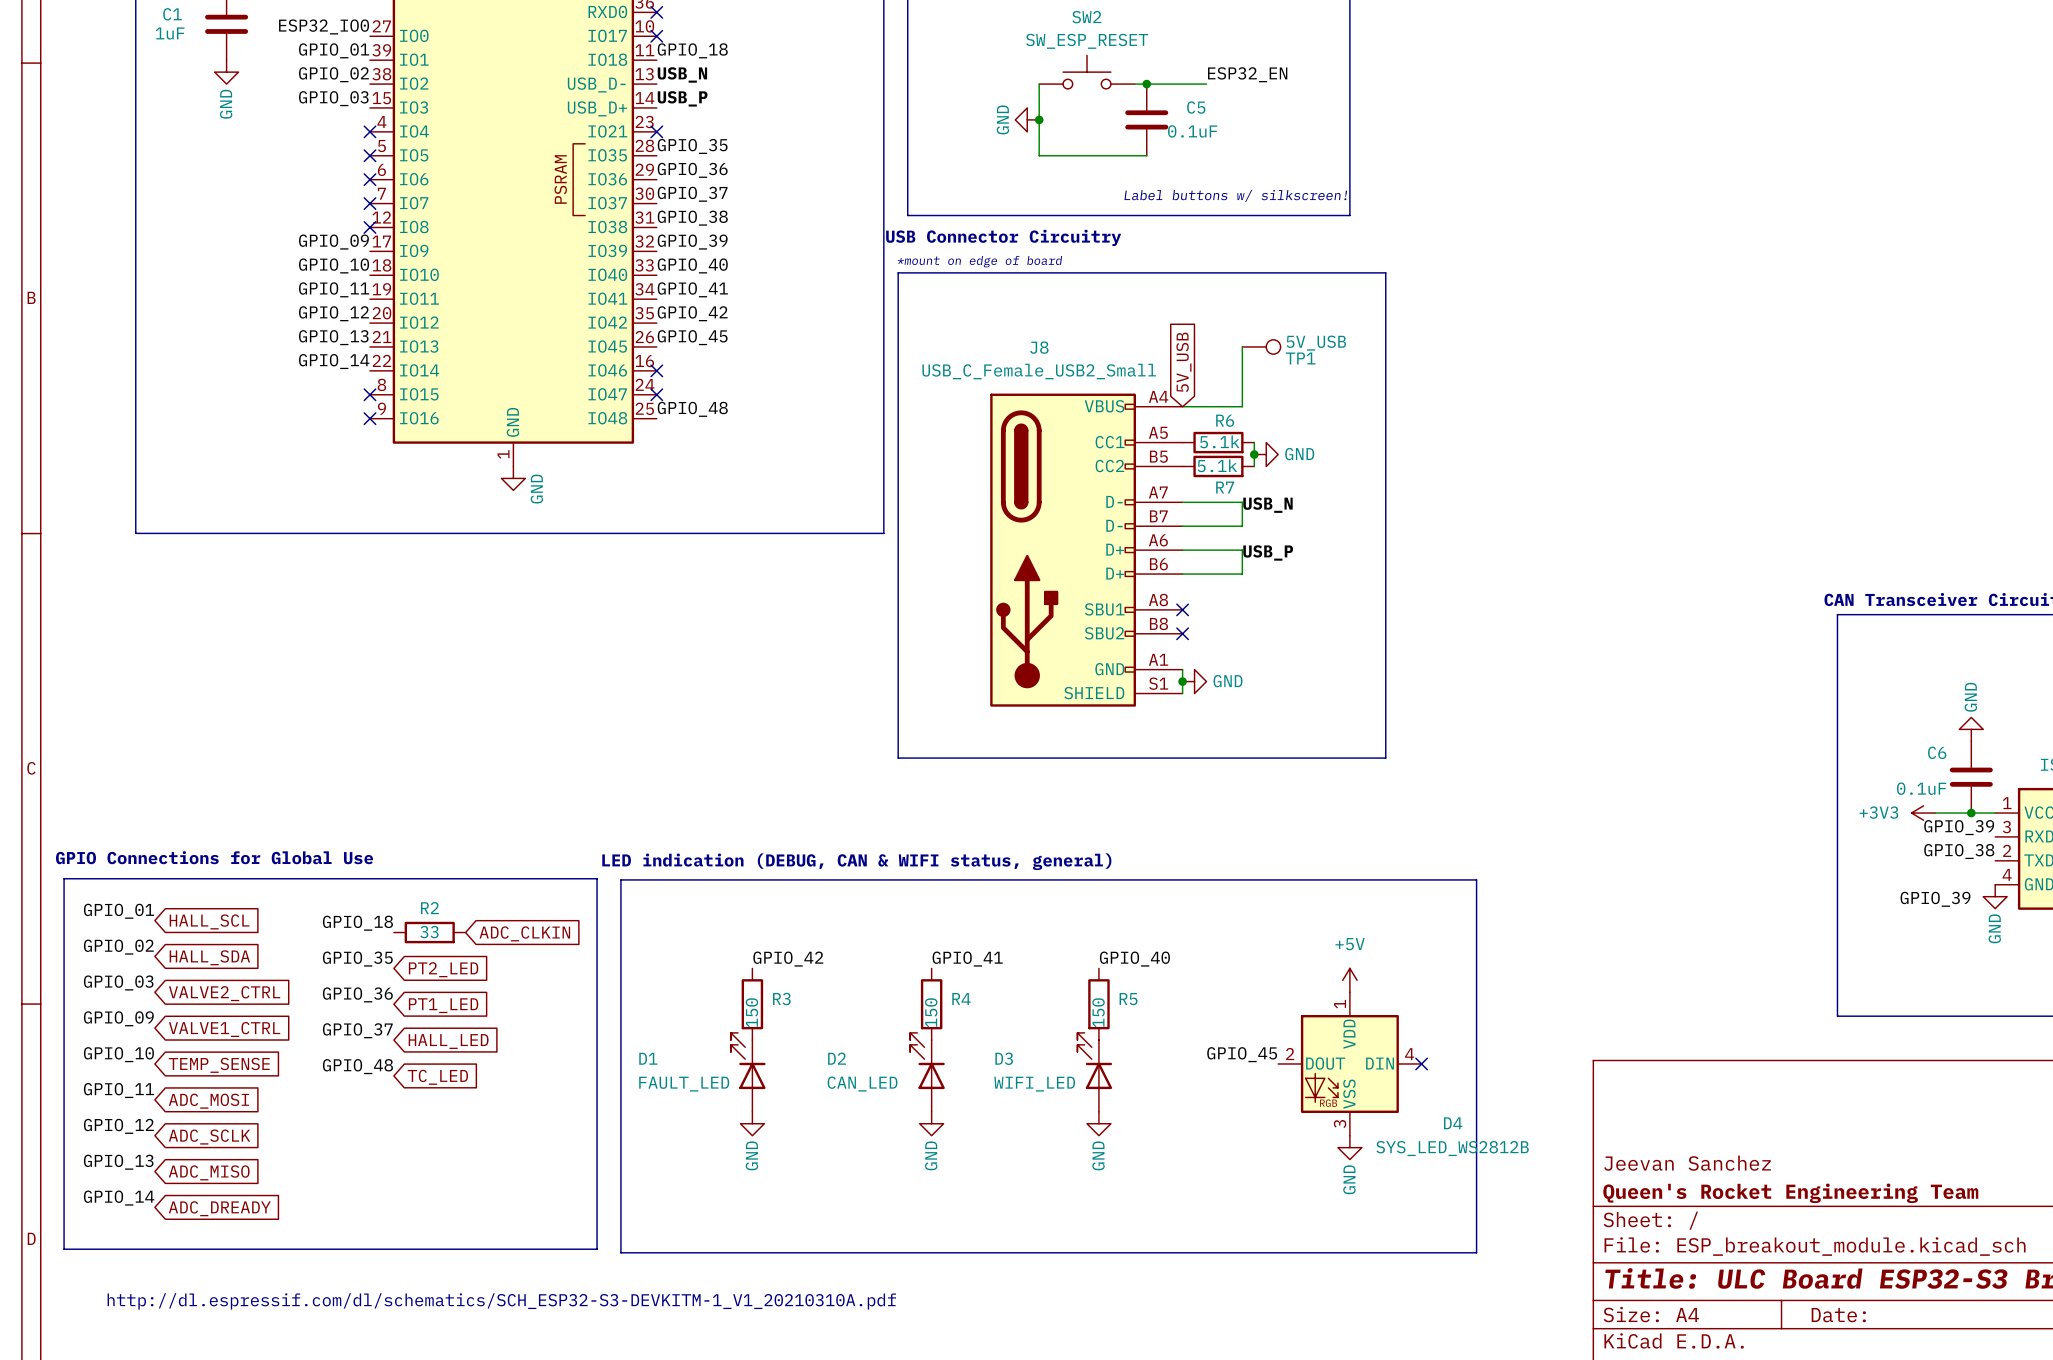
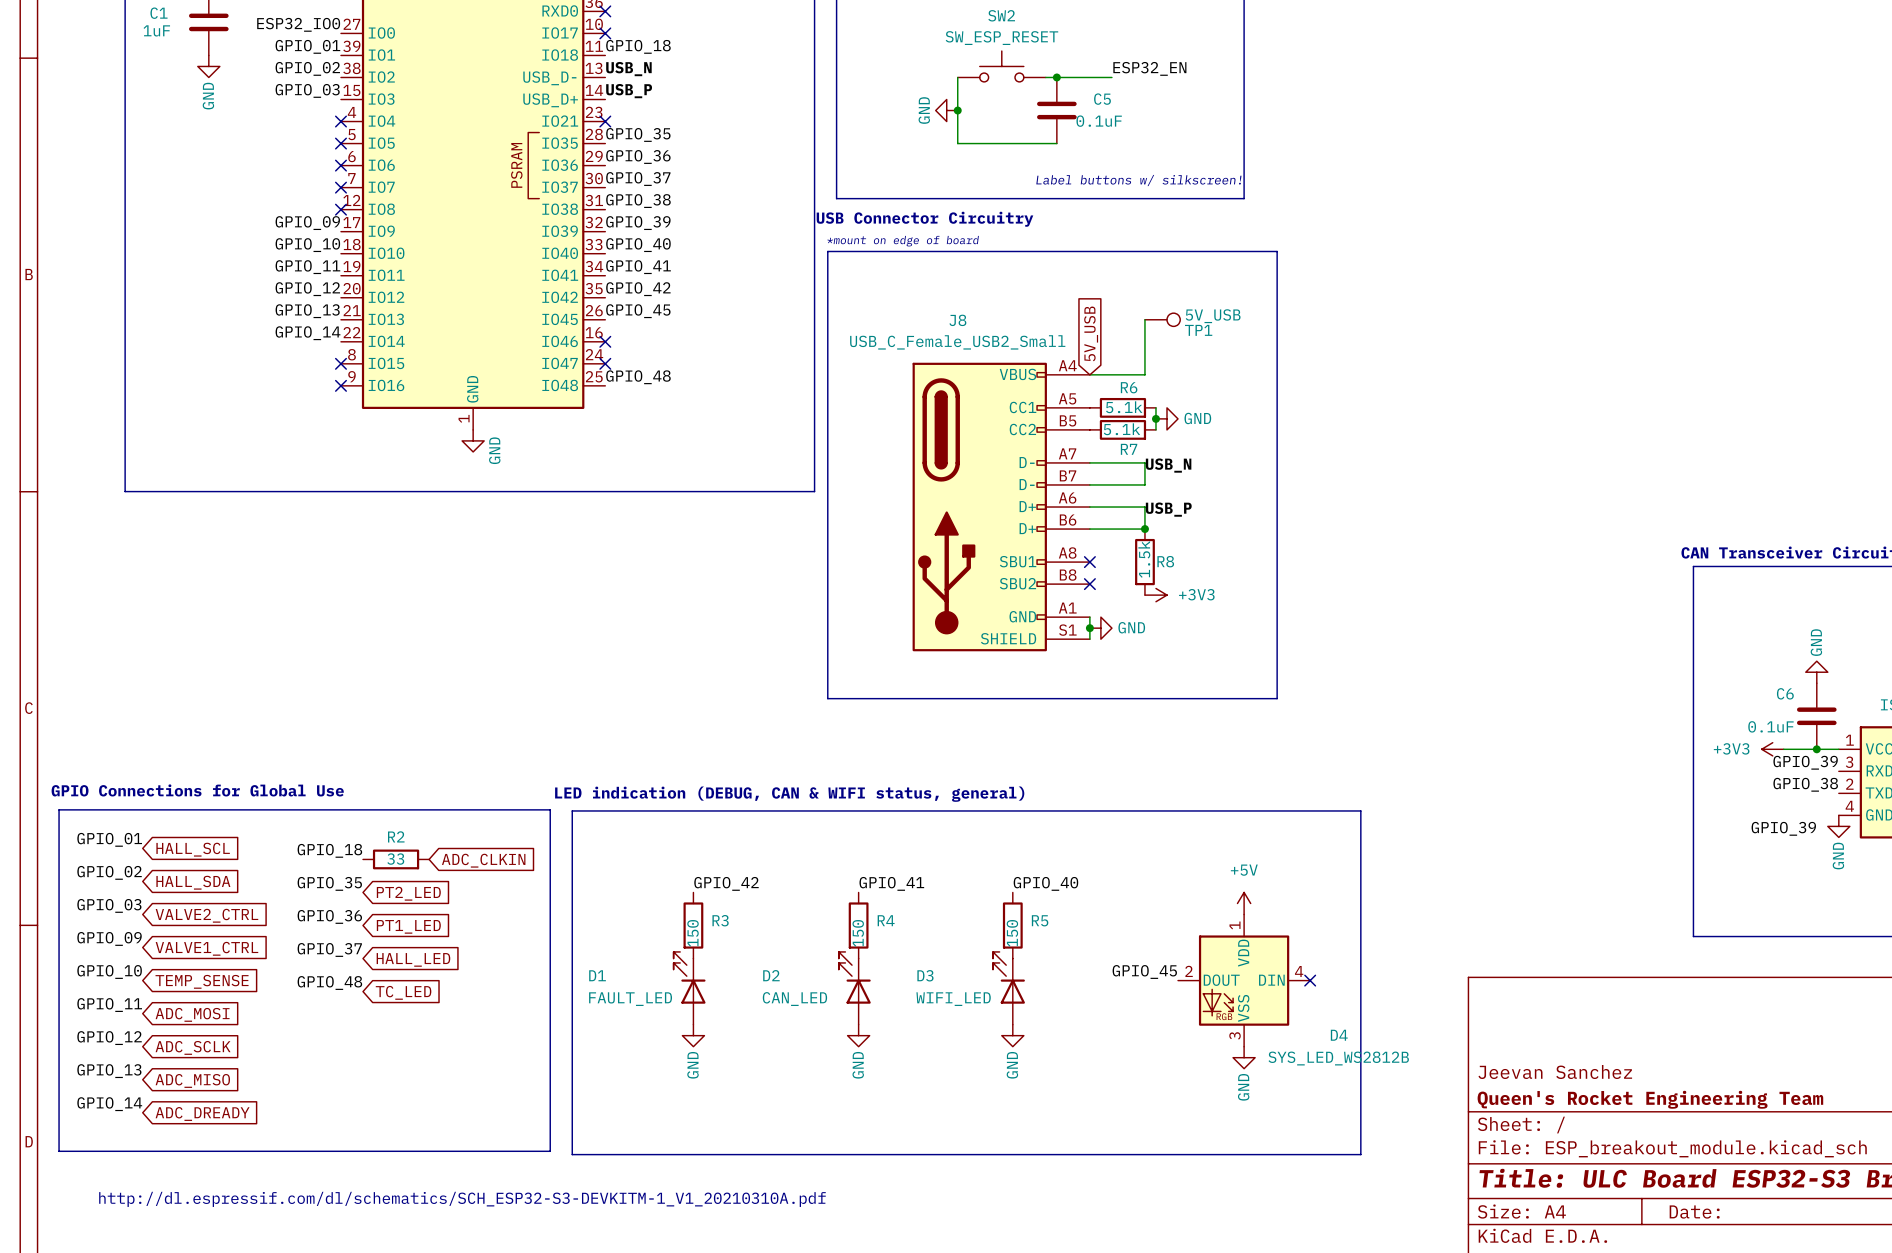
junction: none -> (1144, 529)
R8: none -> 1.5k (1144, 562)
power symbol: none -> +3V3 (1155, 595)

